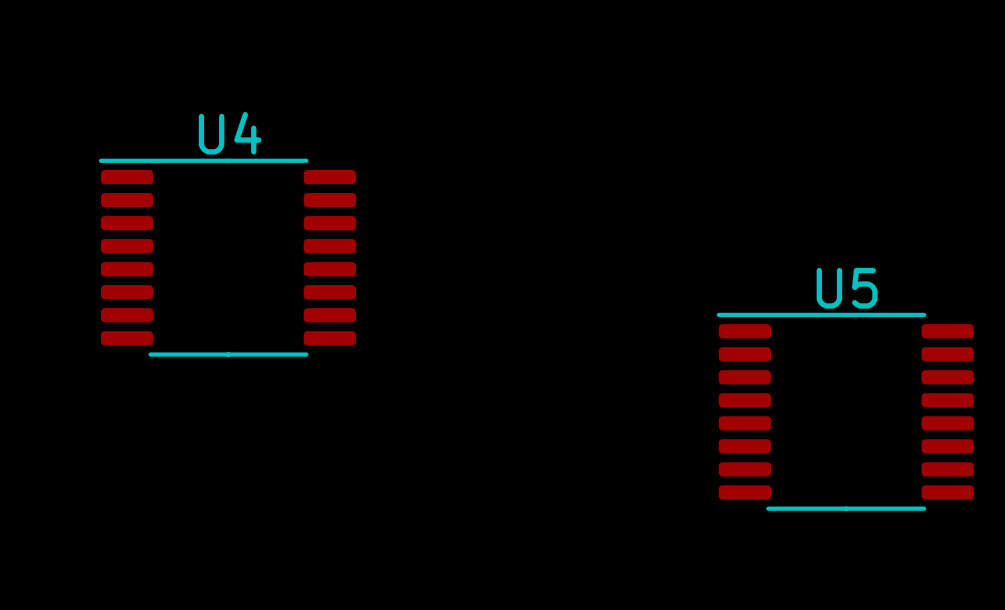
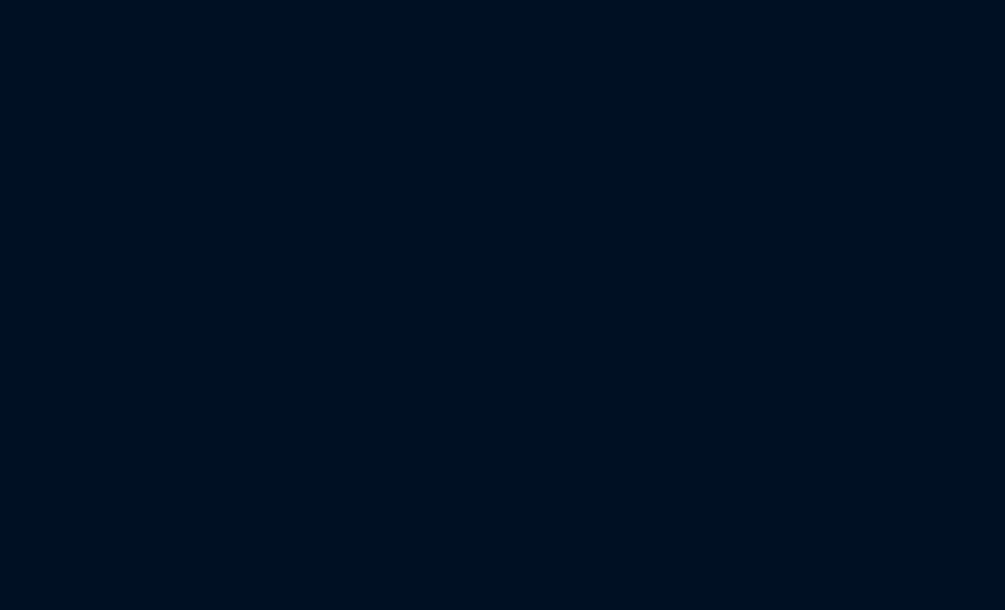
U4: (227, 257) -> none
U5: (845, 411) -> none

